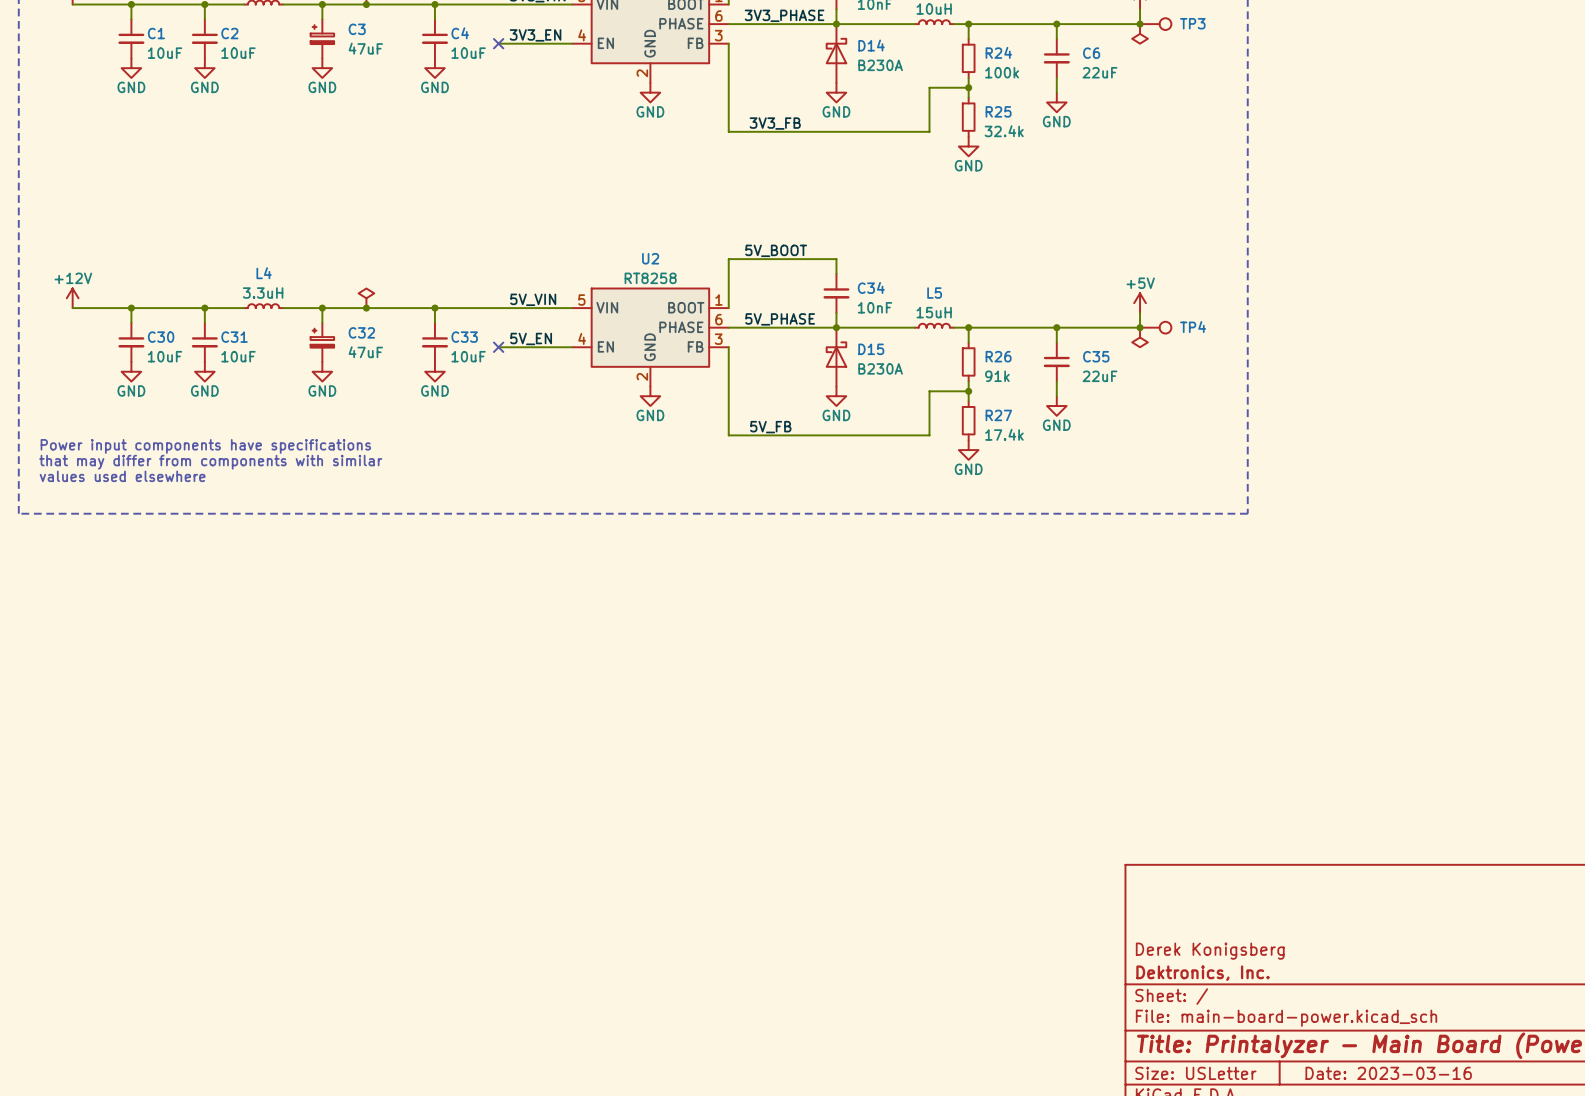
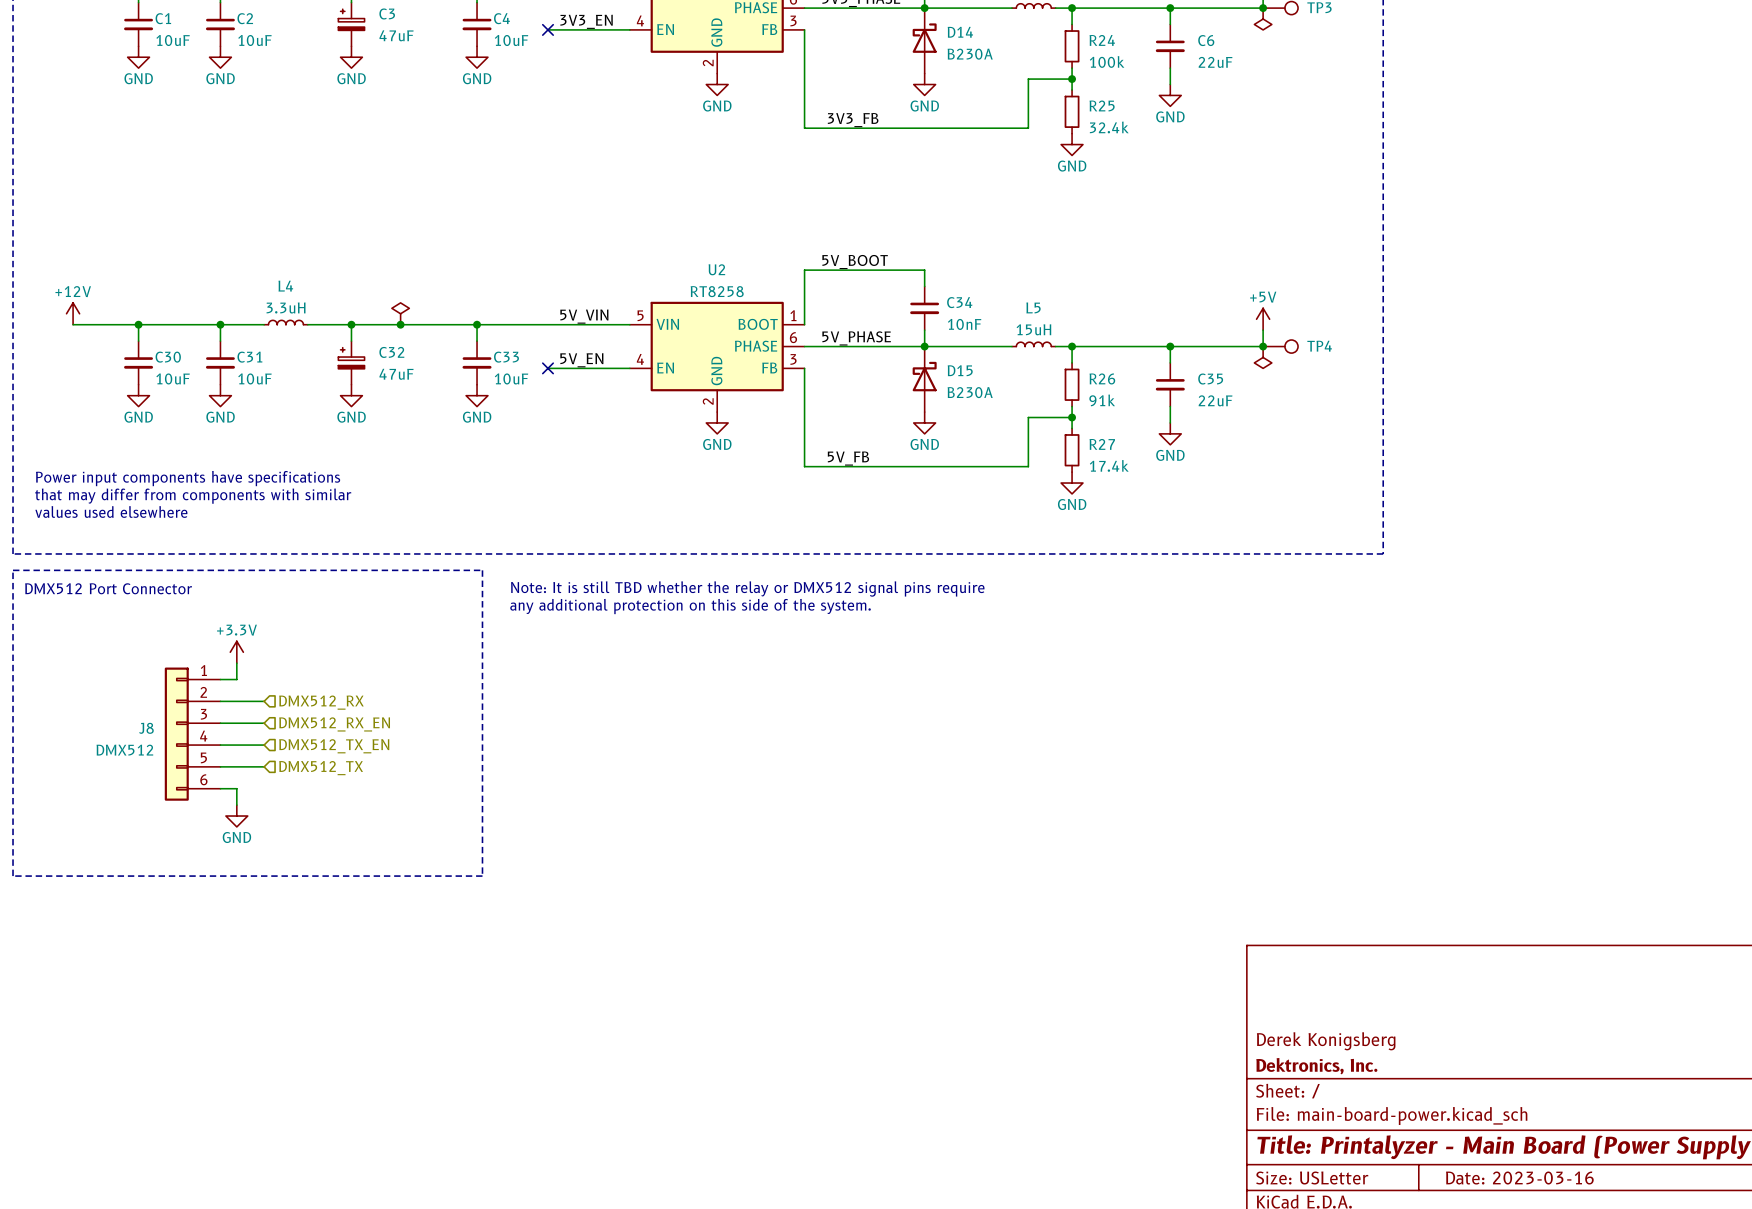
line: none -> (13, 570) (482, 570) (482, 876) (13, 876) (13, 570)
text: none -> DMX512 Port Connector (108, 588)
text: none -> Note: It is still TBD whether the relay or DMX512 signal pins require (747, 589)
text: none -> any additional protection on this side of the system. (690, 606)
power symbol: none -> +3.3V (236, 652)
wire: none -> (236, 663) (236, 679) (220, 679)
wire: none -> (220, 701) (264, 701)
hierarchical label: none -> DMX512_RX (321, 702)
wire: none -> (220, 723) (264, 723)
hierarchical label: none -> DMX512_RX_EN (334, 724)
J8: none -> DMX512 (192, 734)
wire: none -> (220, 745) (264, 745)
hierarchical label: none -> DMX512_TX_EN (334, 746)
wire: none -> (220, 766) (264, 766)
hierarchical label: none -> DMX512_TX (321, 768)
wire: none -> (220, 788) (236, 788) (236, 805)
power symbol: none -> GND (236, 816)

